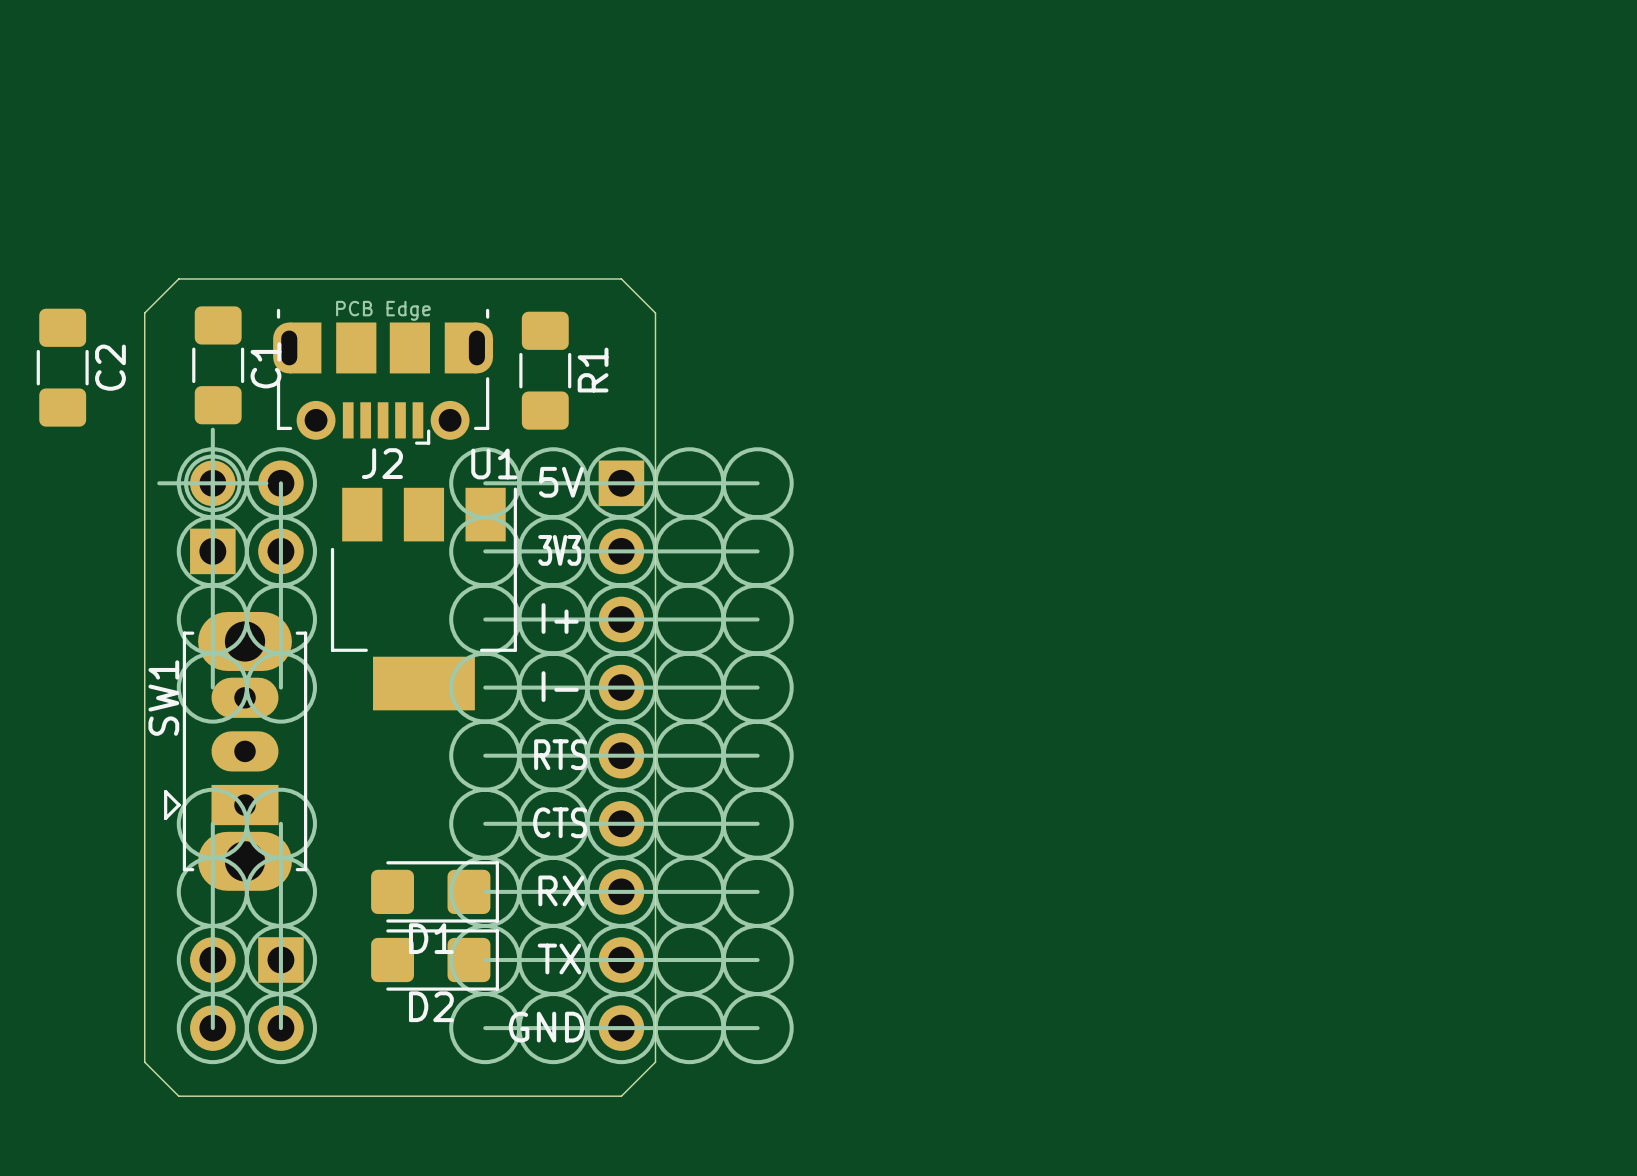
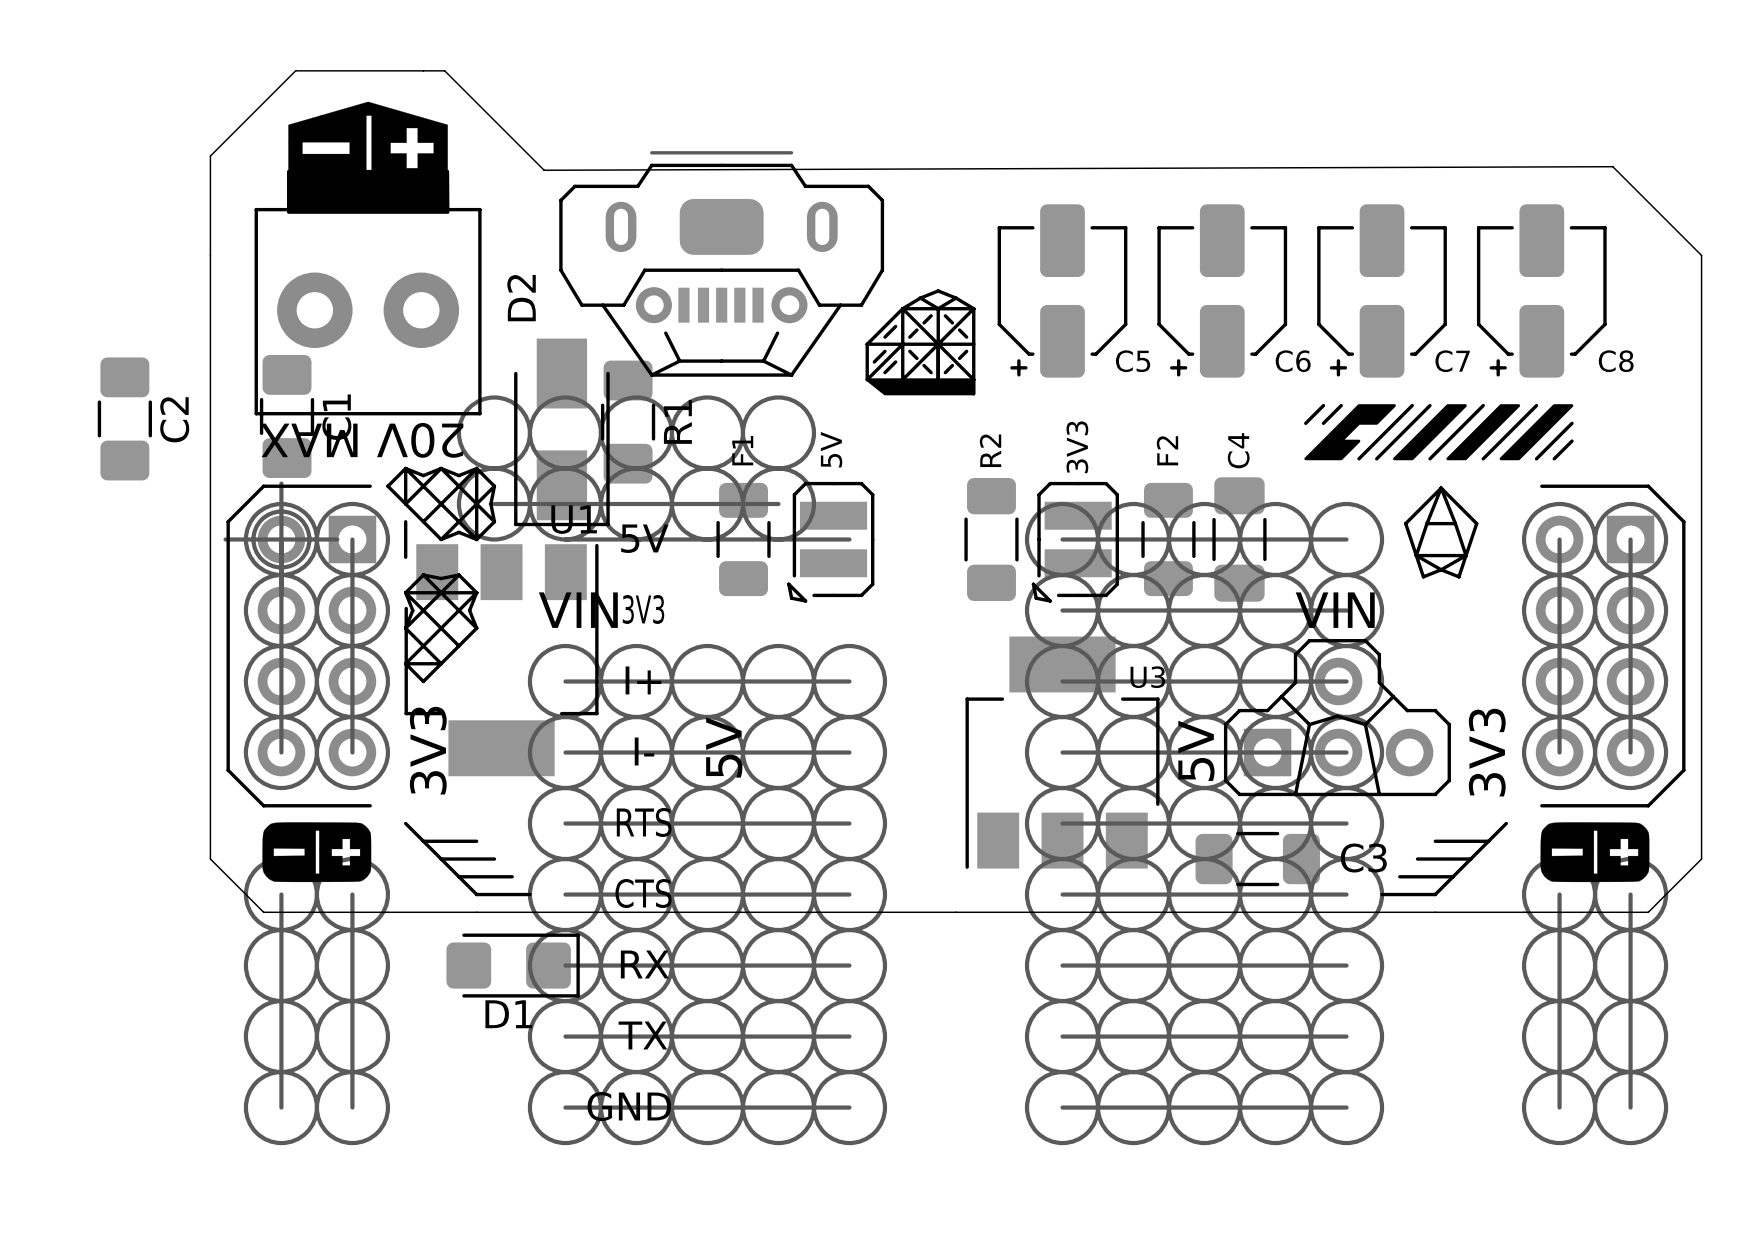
drawing: none -> [287, 101, 450, 214]
part: none -> (721, 263)
C5: none -> (1062, 290)
C6: none -> (1222, 290)
C7: none -> (1382, 290)
C8: none -> (1541, 290)
line: none -> (920, 298) (938, 290) (955, 298)
line: none -> (920, 298) (938, 308)
line: none -> (920, 298) (902, 308)
line: none -> (955, 298) (973, 308)
line: none -> (955, 298) (938, 308)
line: none -> (902, 308) (973, 379)
line: none -> (902, 308) (973, 308)
line: none -> (902, 308) (867, 344)
line: none -> (938, 308) (938, 379)
line: none -> (973, 308) (973, 393)
line: none -> (973, 308) (902, 379) (902, 312)
part: none -> (368, 311)
line: none -> (931, 315) (924, 322)
line: none -> (945, 315) (952, 322)
line: none -> (895, 326) (884, 337)
line: none -> (916, 330) (909, 337)
line: none -> (959, 330) (966, 337)
line: none -> (867, 344) (973, 344)
line: none -> (867, 344) (867, 379) (902, 344)
line: none -> (884, 351) (874, 361)
line: none -> (909, 351) (916, 358)
line: none -> (966, 351) (959, 358)
board edge: (144, 313) (178, 278) (621, 278) (655, 313) (655, 1062) (621, 1096) (178, 1096) (144, 1062) (144, 789) -> (210, 361) (210, 156) (295, 70) (444, 70) (544, 170) (1612, 166) (1701, 255) (1701, 859) (1648, 912) (263, 912) (210, 859)
line: none -> (895, 361) (884, 372)
line: none -> (924, 365) (931, 372)
line: none -> (952, 365) (945, 372)
drawing: none -> [865, 378, 976, 396]
drawing: none -> [456, 395, 817, 542]
drawing: none -> [1304, 404, 1574, 461]
line: none -> (1323, 405) (1305, 423)
line: none -> (1341, 405) (1323, 423)
line: none -> (1412, 405) (1358, 458)
line: none -> (1429, 405) (1376, 458)
line: none -> (1483, 405) (1429, 458)
line: none -> (1536, 405) (1483, 458)
line: none -> (1571, 423) (1536, 458)
J2: (383, 376) -> none
text: none -> 20V MAX (362, 440)
line: none -> (1571, 441) (1554, 458)
text: none -> 3V3 (1077, 447)
text: none -> 5V (831, 449)
line: none -> (405, 468) (423, 475) (441, 468)
line: none -> (405, 468) (405, 503) (441, 468)
line: none -> (405, 468) (476, 539)
line: none -> (405, 468) (387, 486) (441, 539)
line: none -> (441, 468) (458, 475) (476, 468)
line: none -> (441, 468) (494, 521)
line: none -> (476, 468) (476, 539)
line: none -> (476, 468) (423, 521)
line: none -> (476, 468) (494, 486)
line: none -> (370, 486) (263, 486) (228, 521) (228, 770) (263, 805) (370, 805)
line: none -> (494, 486) (490, 503) (494, 521)
line: none -> (494, 486) (441, 539)
line: none -> (1541, 486) (1648, 486) (1683, 521) (1683, 770) (1648, 805) (1541, 805)
line: none -> (1441, 488) (1455, 523)
line: none -> (1441, 488) (1426, 523)
line: none -> (1441, 488) (1405, 523) (1423, 576) (1441, 569)
line: none -> (1441, 488) (1476, 523) (1458, 576) (1441, 569)
drawing: [449, 447, 794, 588] -> none
drawing: none -> [1024, 501, 1385, 1146]
drawing: none -> [1521, 501, 1669, 1146]
line: none -> (405, 521) (405, 557)
line: none -> (494, 521) (476, 539)
line: none -> (1426, 523) (1455, 523)
line: none -> (1426, 523) (1416, 555)
line: none -> (1455, 523) (1466, 555)
line: none -> (441, 539) (458, 532) (476, 539)
drawing position: (485, 483) -> (565, 503)
drawing position: (553, 483) -> (636, 503)
drawing position: (621, 483) -> (707, 503)
F1: none -> (743, 539)
drawing position: (689, 483) -> (778, 503)
R2: none -> (991, 539)
line: none -> (1062, 539) (1346, 539)
F2: none -> (1168, 539)
C4: none -> (1239, 539)
line: none -> (1559, 539) (1559, 752)
line: none -> (1630, 539) (1630, 752)
part: none -> (830, 542)
part: none -> (1075, 542)
line: none -> (1416, 555) (1441, 569)
line: none -> (1416, 555) (1466, 555)
line: none -> (1466, 555) (1441, 569)
part: (246, 517) -> none
line: none -> (423, 575) (476, 628)
line: none -> (423, 575) (405, 592)
line: none -> (423, 575) (441, 578) (458, 575)
line: none -> (458, 575) (405, 628)
line: none -> (458, 575) (476, 592)
line: none -> (405, 592) (476, 592)
line: none -> (405, 592) (458, 646)
line: none -> (405, 592) (412, 610) (405, 628)
line: none -> (476, 592) (405, 663)
line: none -> (476, 592) (469, 610) (476, 628)
line: (485, 551) (757, 551) -> (494, 503) (778, 503)
text: none -> VIN (578, 610)
line: none -> (1062, 610) (1346, 610)
text: none -> VIN (1335, 610)
line: none -> (405, 628) (441, 663) (405, 663)
line: none -> (476, 628) (423, 681) (405, 663)
part: none -> (316, 646)
part: none -> (1595, 646)
line: none -> (1062, 681) (1346, 681)
part: none -> (1337, 717)
text: none -> 5V (724, 747)
text: none -> 5V (1196, 750)
text: none -> 3V3 (428, 750)
line: none -> (1062, 752) (1346, 752)
U3: none -> (1062, 752)
text: none -> 3V3 (1487, 752)
SW1: (235, 751) -> none
drawing: none -> [262, 822, 372, 883]
line: none -> (405, 823) (476, 894) (529, 894)
part: (621, 755) -> none
line: none -> (1062, 823) (1346, 823)
line: none -> (1506, 823) (1435, 894) (1382, 894)
line: none -> (423, 841) (476, 841)
line: none -> (1435, 841) (1488, 841)
line: none -> (441, 859) (494, 859)
C3: none -> (1257, 859)
line: none -> (1417, 859) (1470, 859)
line: none -> (458, 876) (512, 876)
line: none -> (1399, 876) (1453, 876)
line: none -> (1062, 894) (1346, 894)
line: none -> (1559, 894) (1559, 1107)
line: none -> (1630, 894) (1630, 1107)
line: none -> (1062, 965) (1346, 965)
D2 footprint: [371, 929, 499, 991] -> [514, 338, 610, 527]
line: none -> (1062, 1036) (1346, 1036)
part: (246, 994) -> none
D2 name position: D2 (431, 1006) -> D2 (521, 298)
line: none -> (1062, 1107) (1346, 1107)

